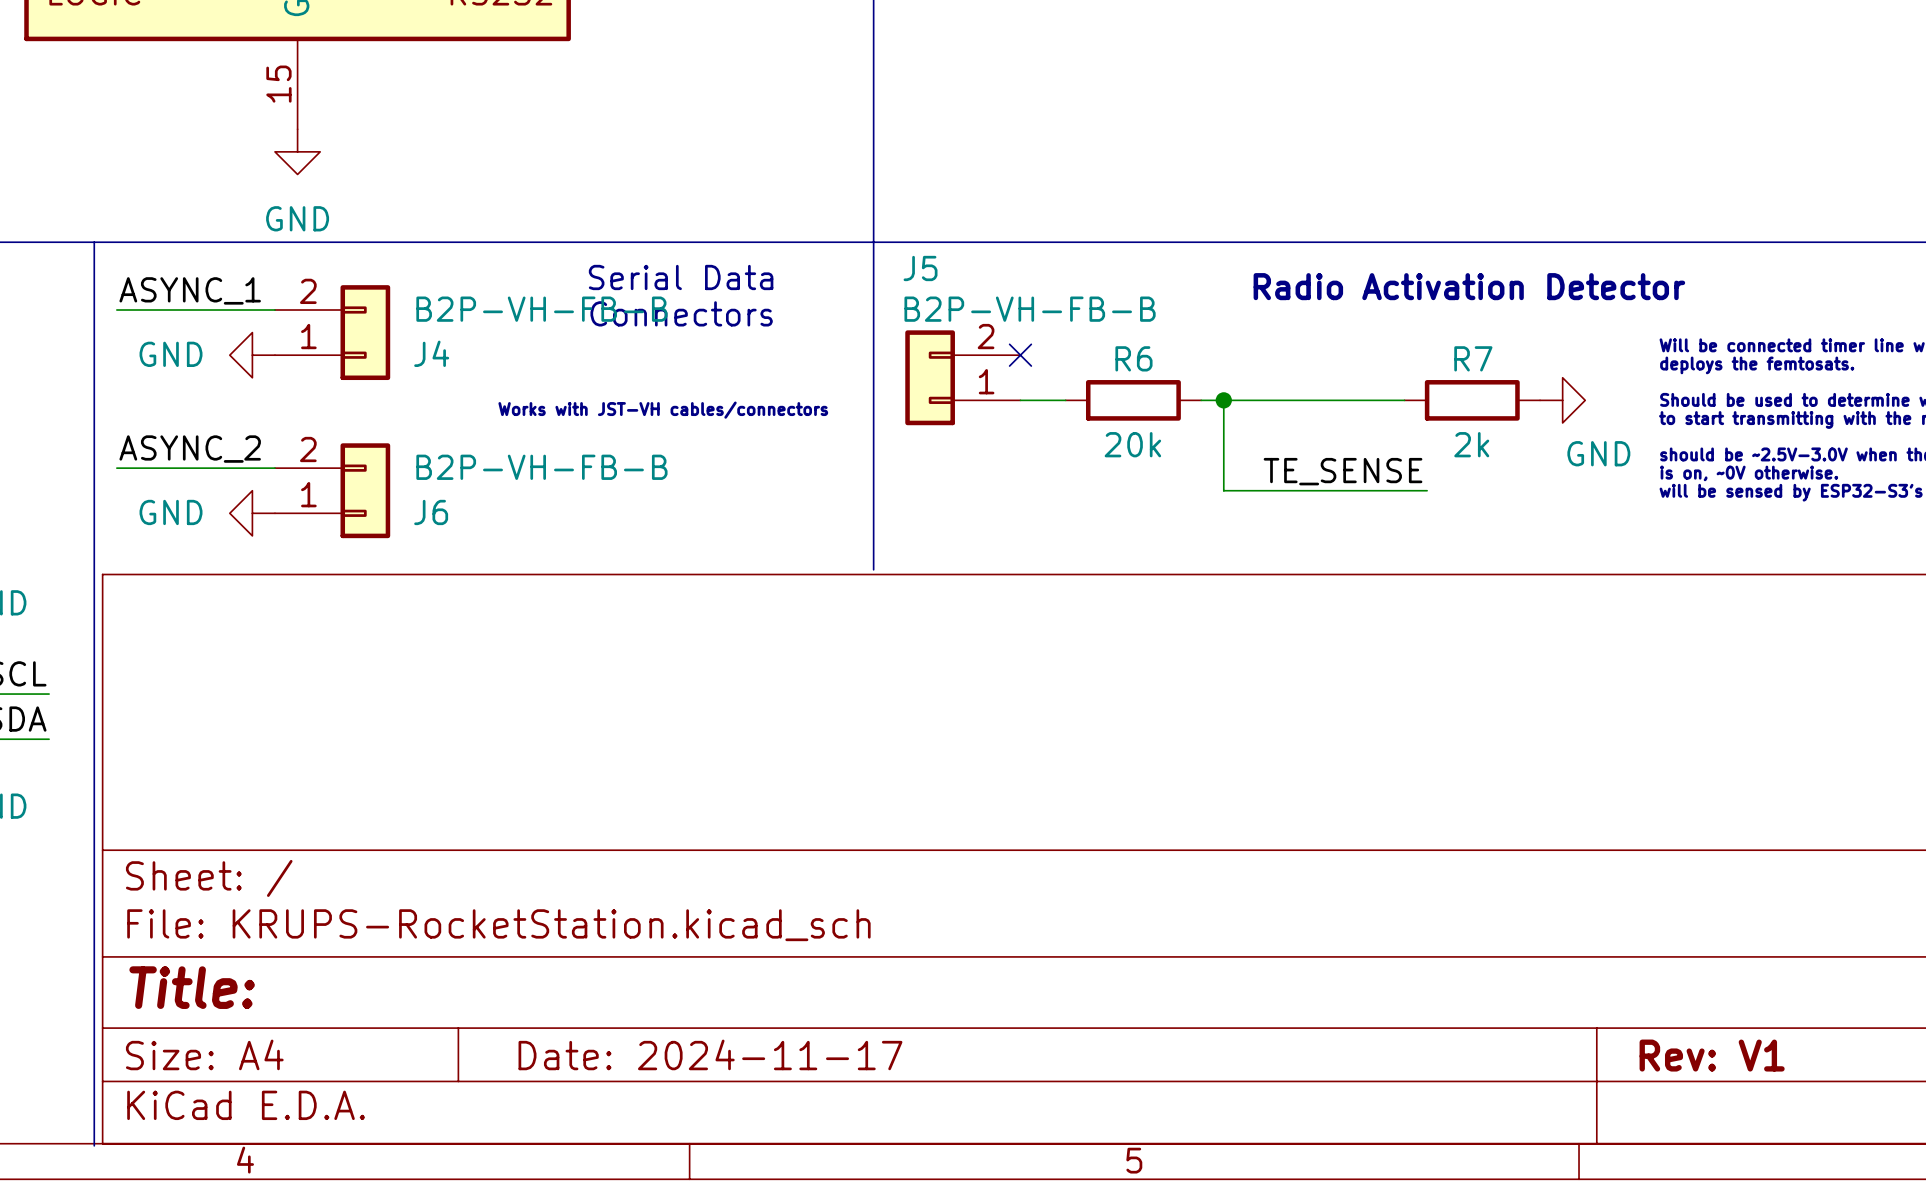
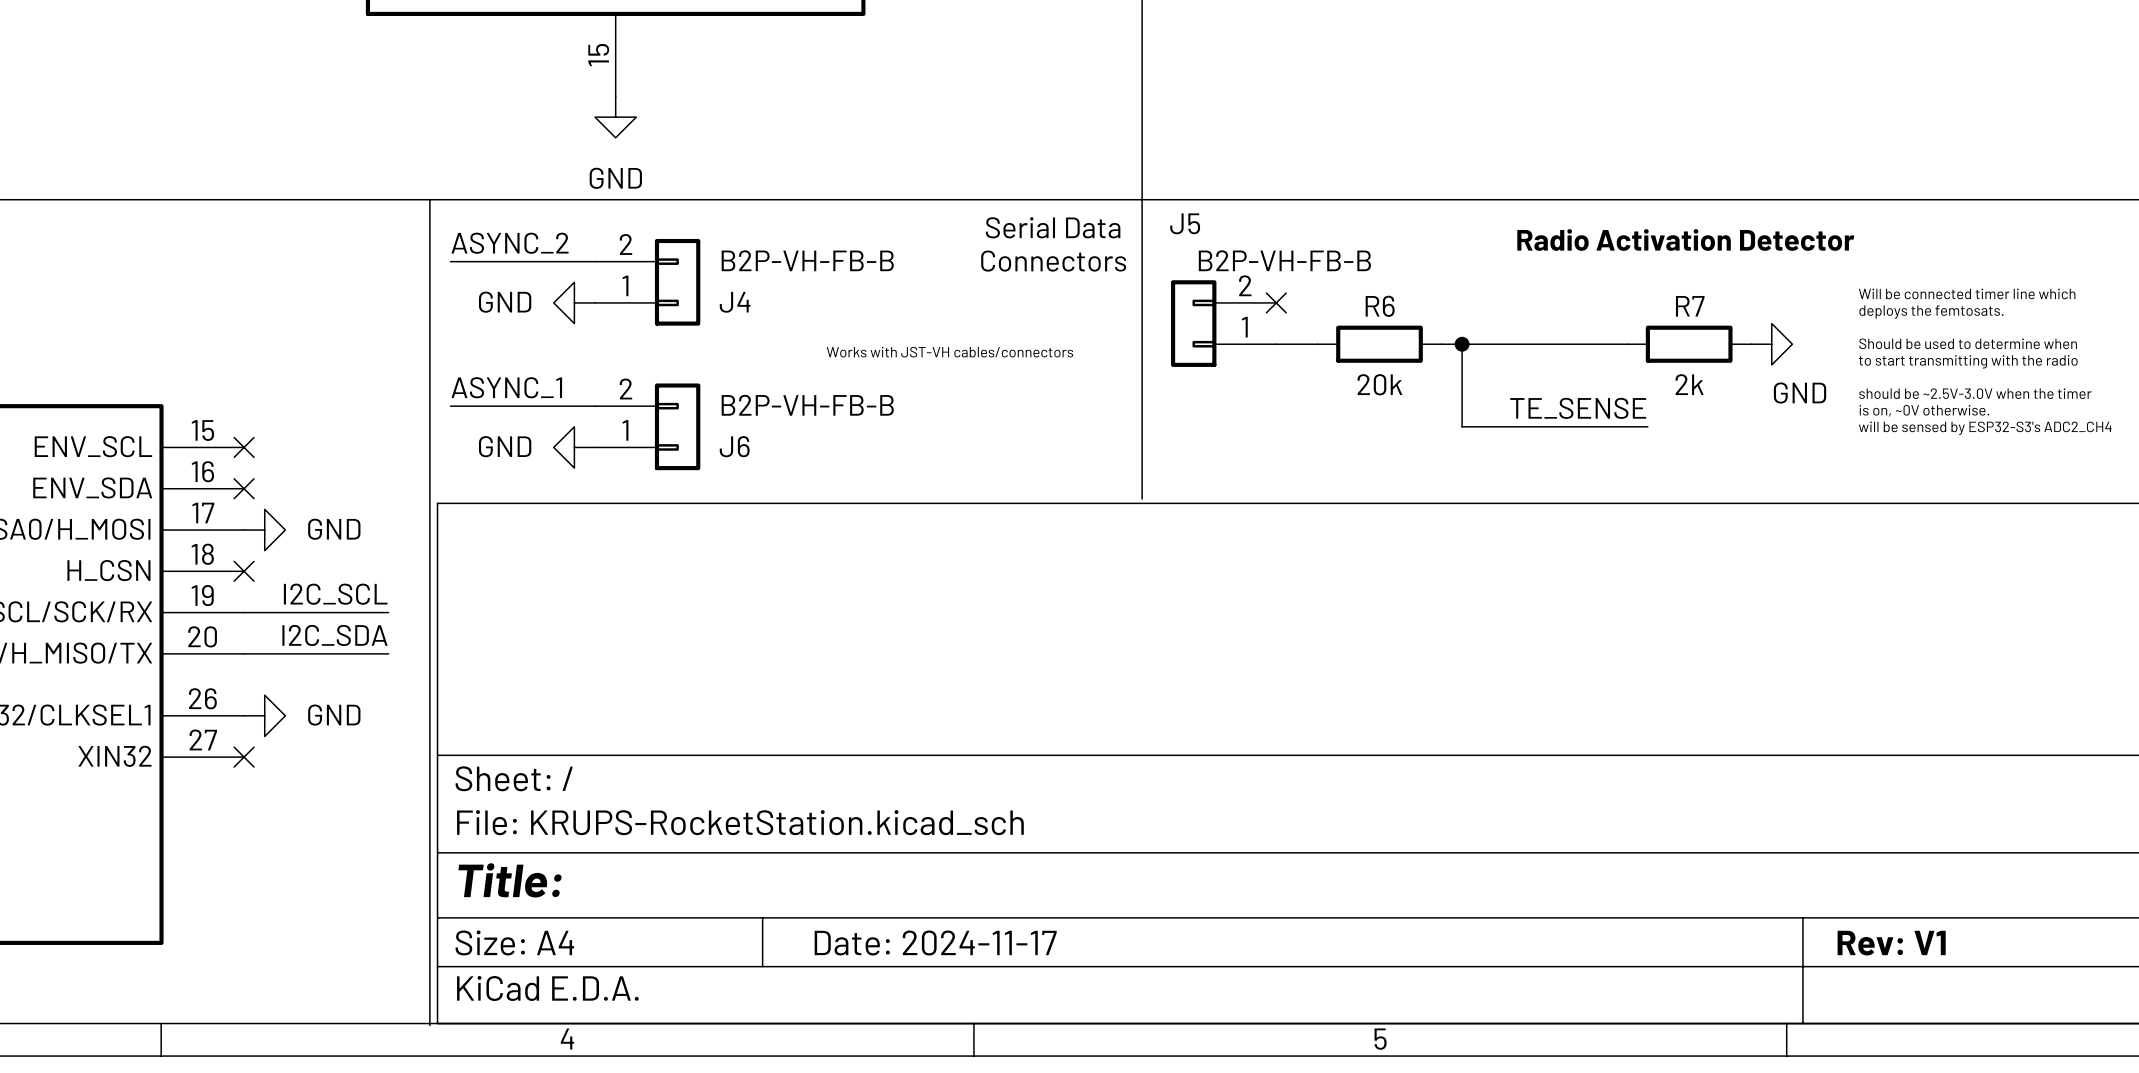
text position: Serial Data (681, 277) -> Serial Data (1053, 227)
label: ASYNC_1 (190, 290) -> ASYNC_2 (510, 243)
text position: Connectors (681, 313) -> Connectors (1053, 261)
label: ASYNC_2 (190, 449) -> ASYNC_1 (506, 387)

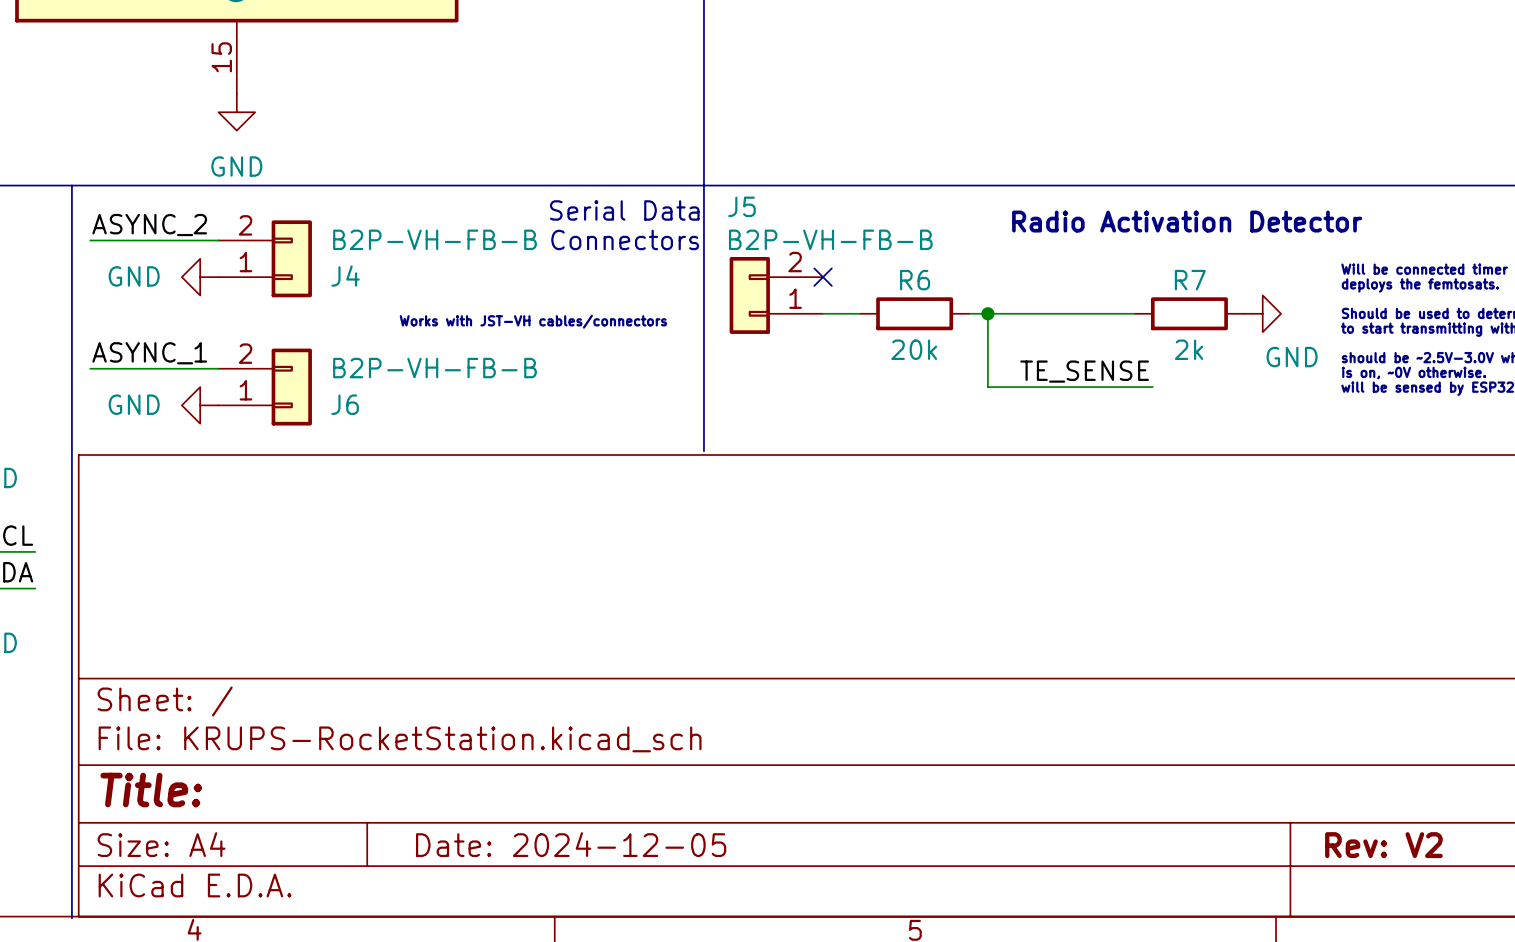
title block: Date: 2024-11-17 (935, 942) -> Date: 2024-12-05 (571, 844)
title block: Rev: V1 (1891, 943) -> Rev: V2 (1383, 845)

